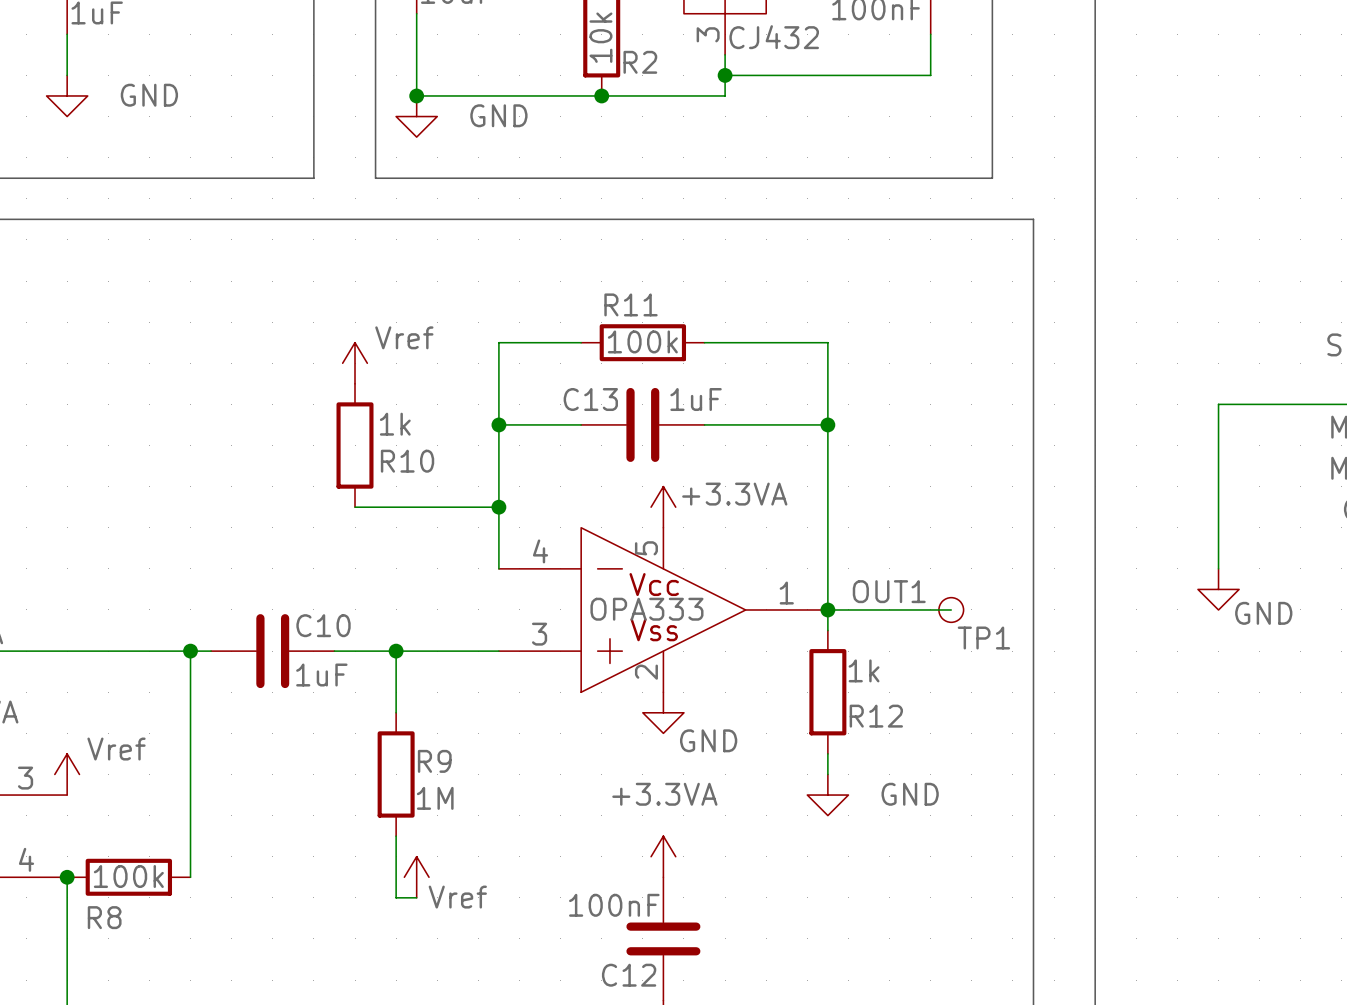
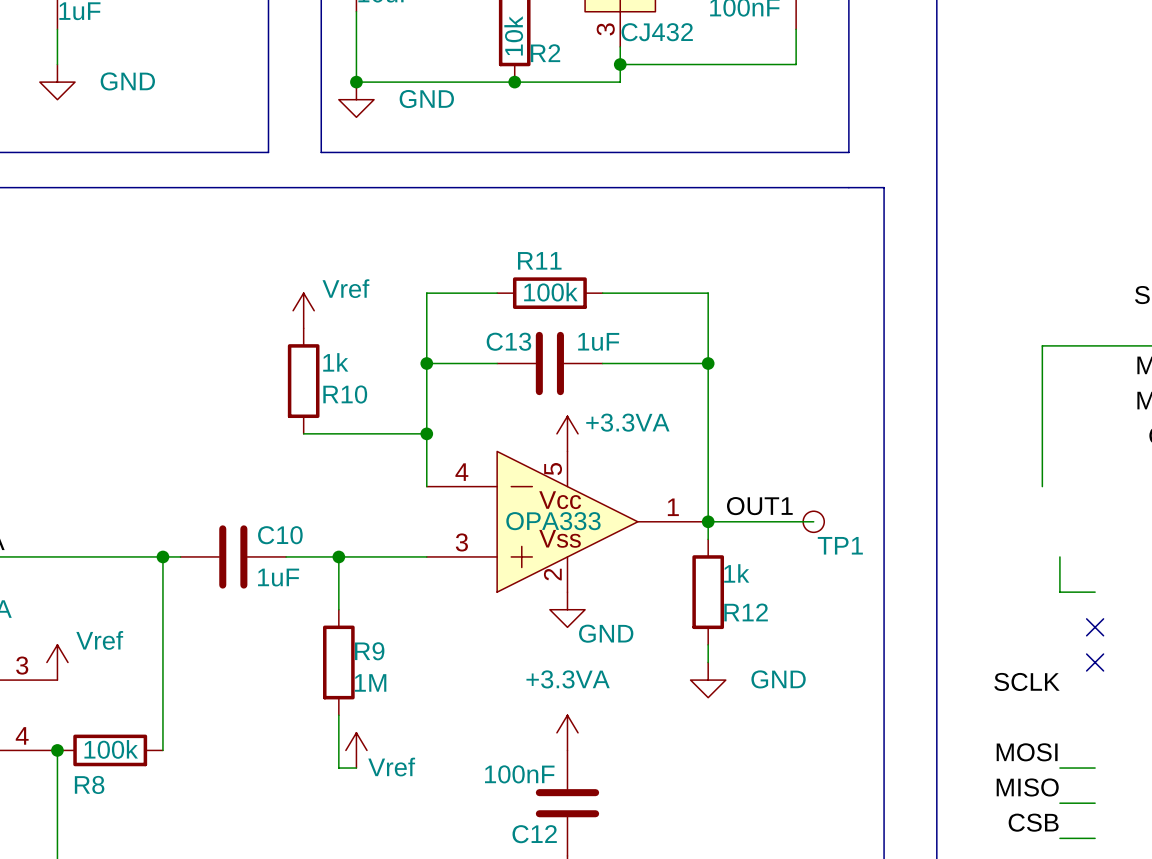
power symbol: GND (1218, 589) -> none
wire: none -> (1059, 556) (1059, 592) (1095, 592)
no-connect mark: none -> (1095, 627)
no-connect mark: none -> (1095, 662)
label: none -> SCLK (1026, 681)
label: none -> MOSI (1027, 752)
wire: none -> (1059, 768) (1095, 768)
label: none -> MISO (1027, 787)
wire: none -> (1059, 803) (1095, 803)
label: none -> CSB (1033, 822)
wire: none -> (1059, 838) (1095, 838)

